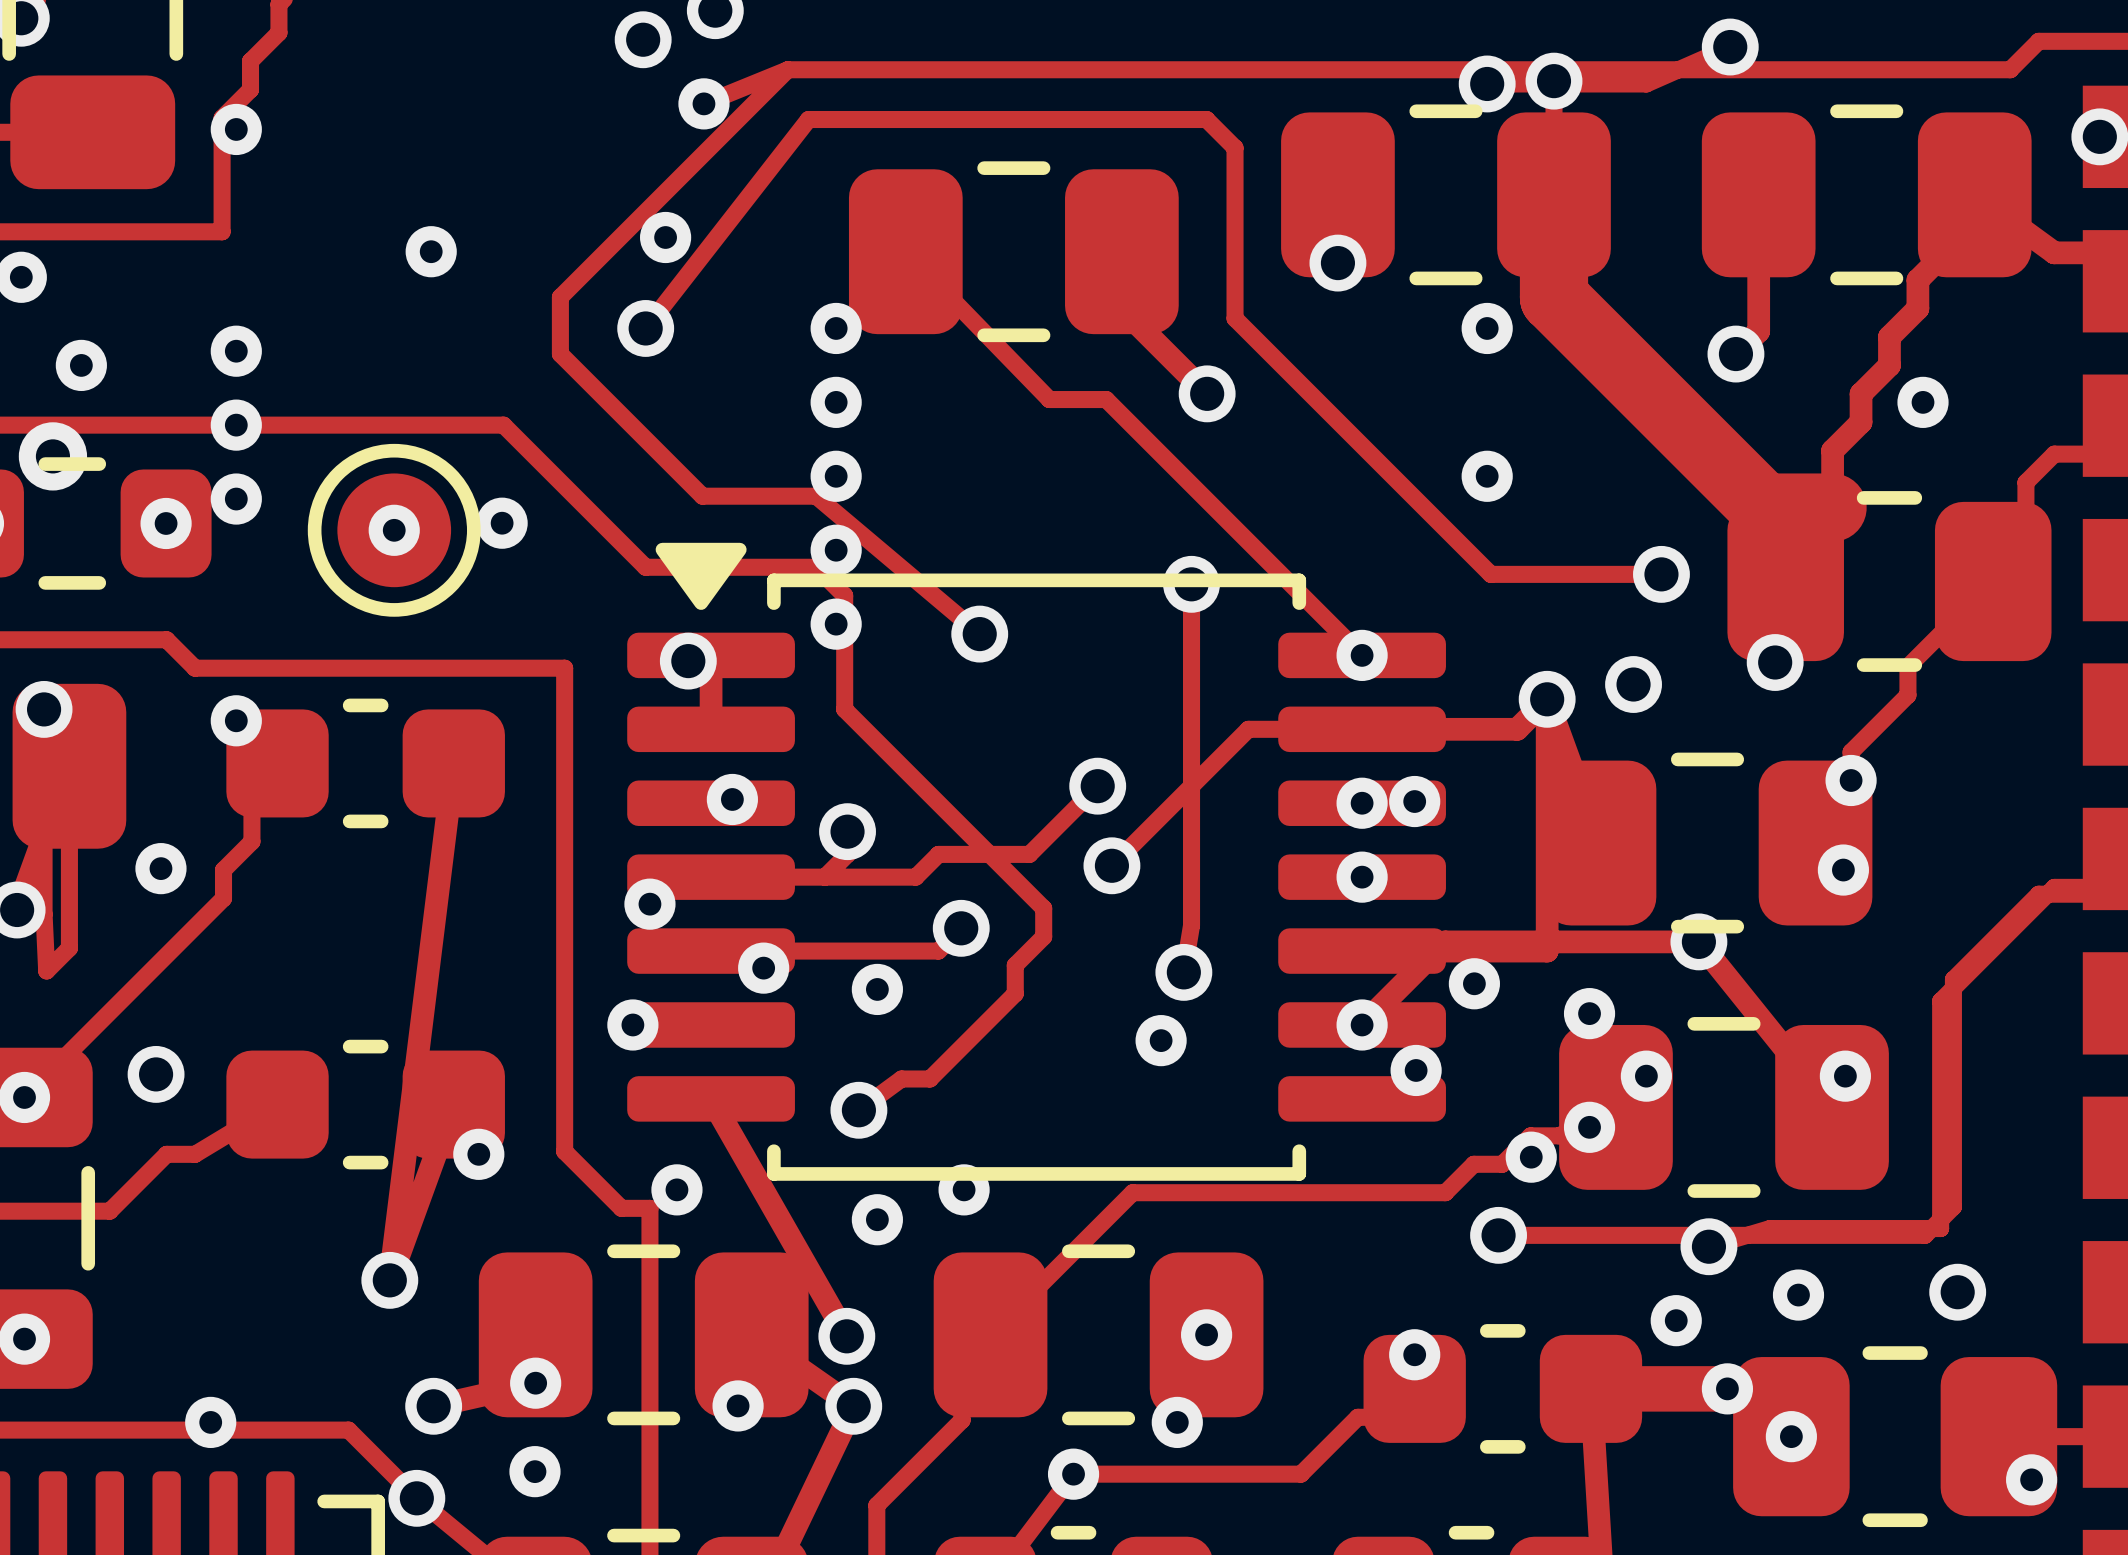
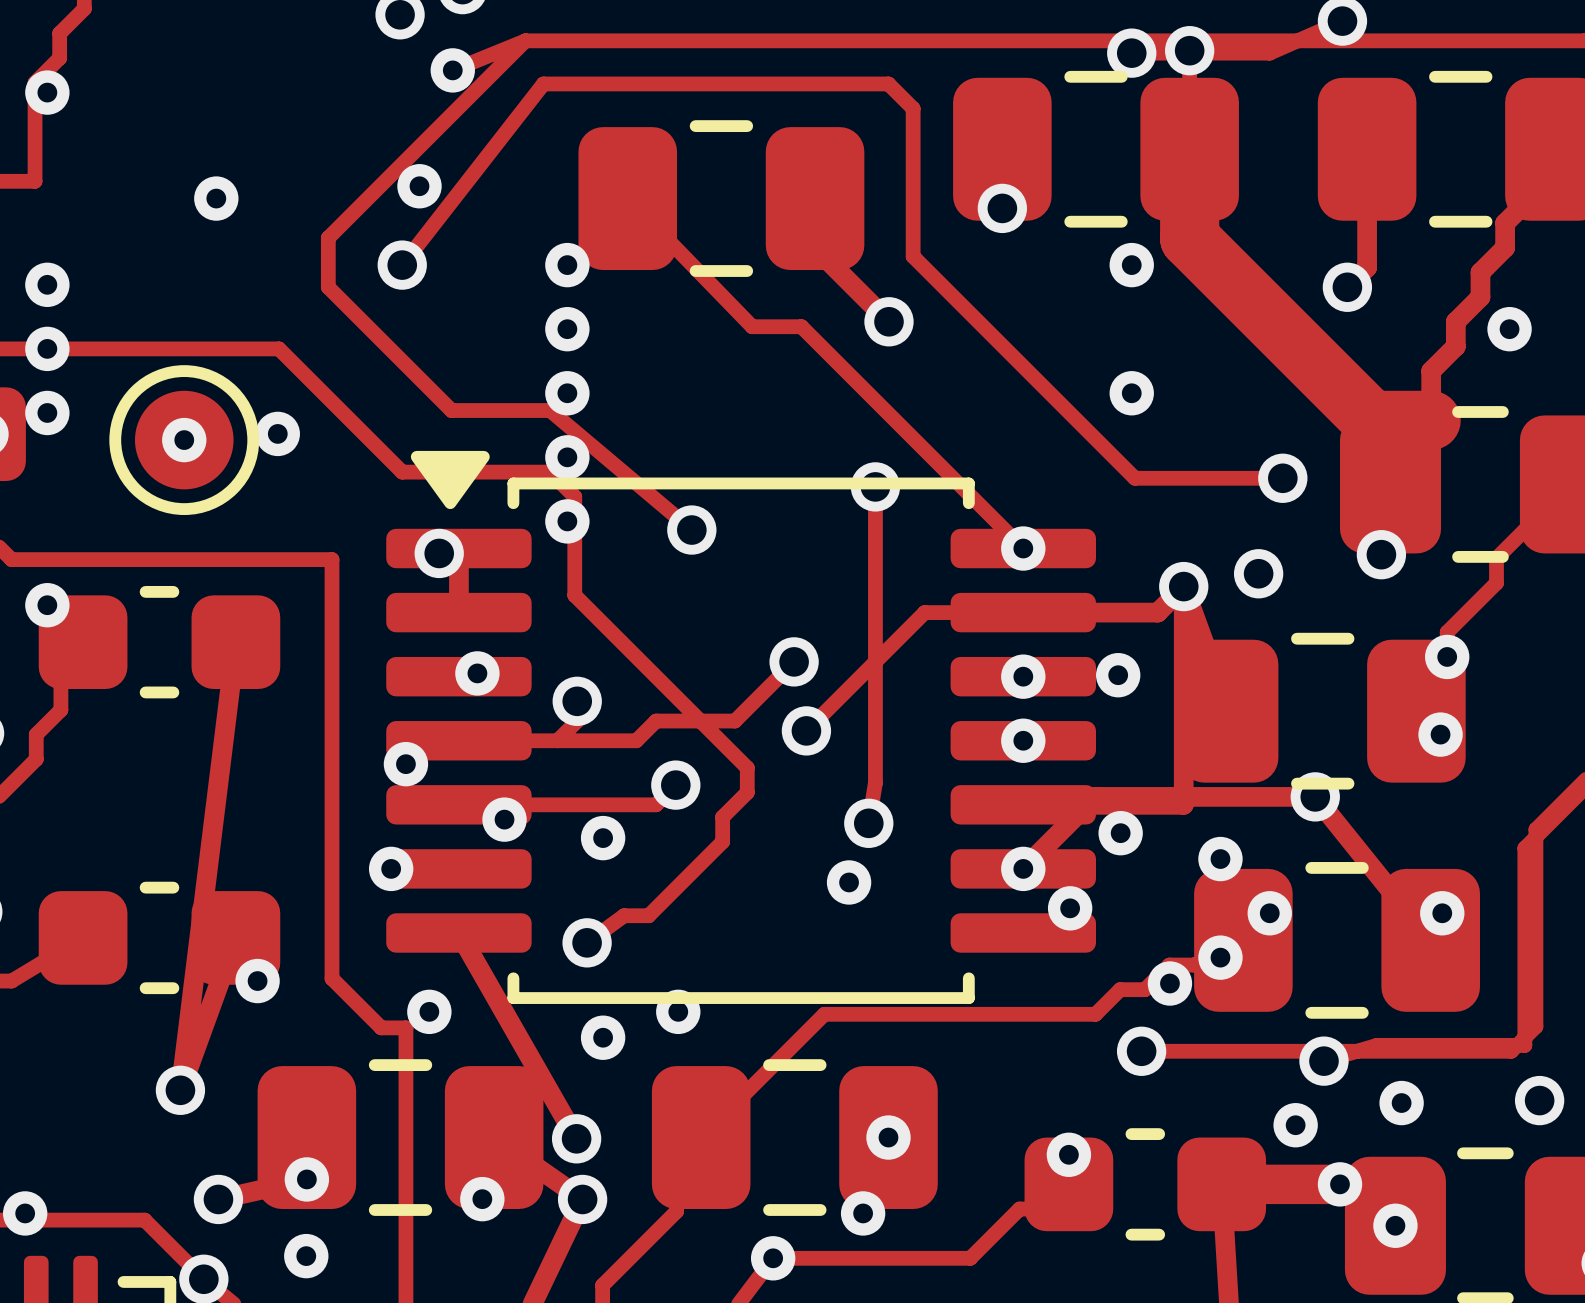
via position: (1414, 801) -> (1118, 675)

